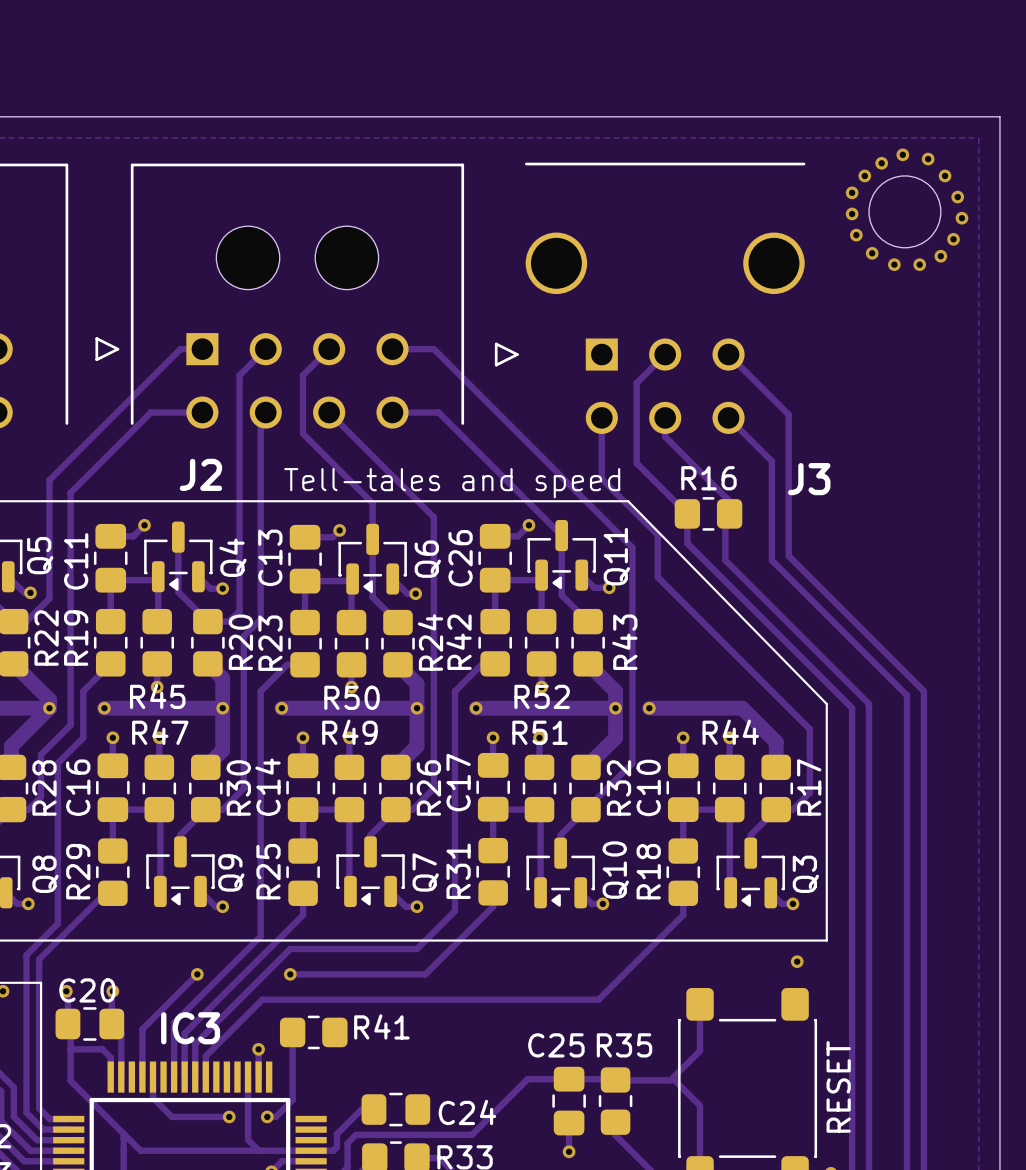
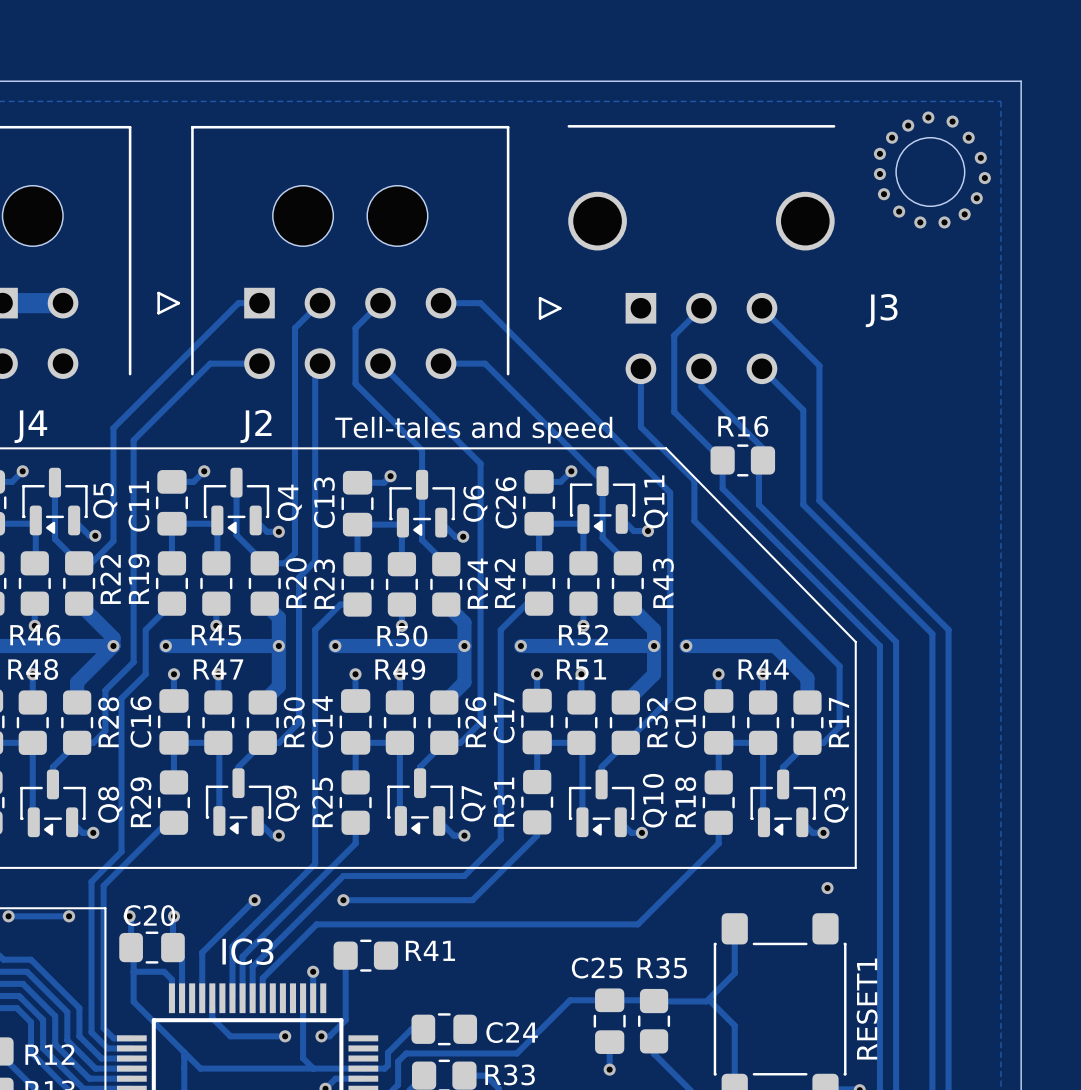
J3 name position: J3 (809, 479) -> J3 (881, 310)
RESET name: RESET (838, 1086) -> RESET1 (867, 1009)

